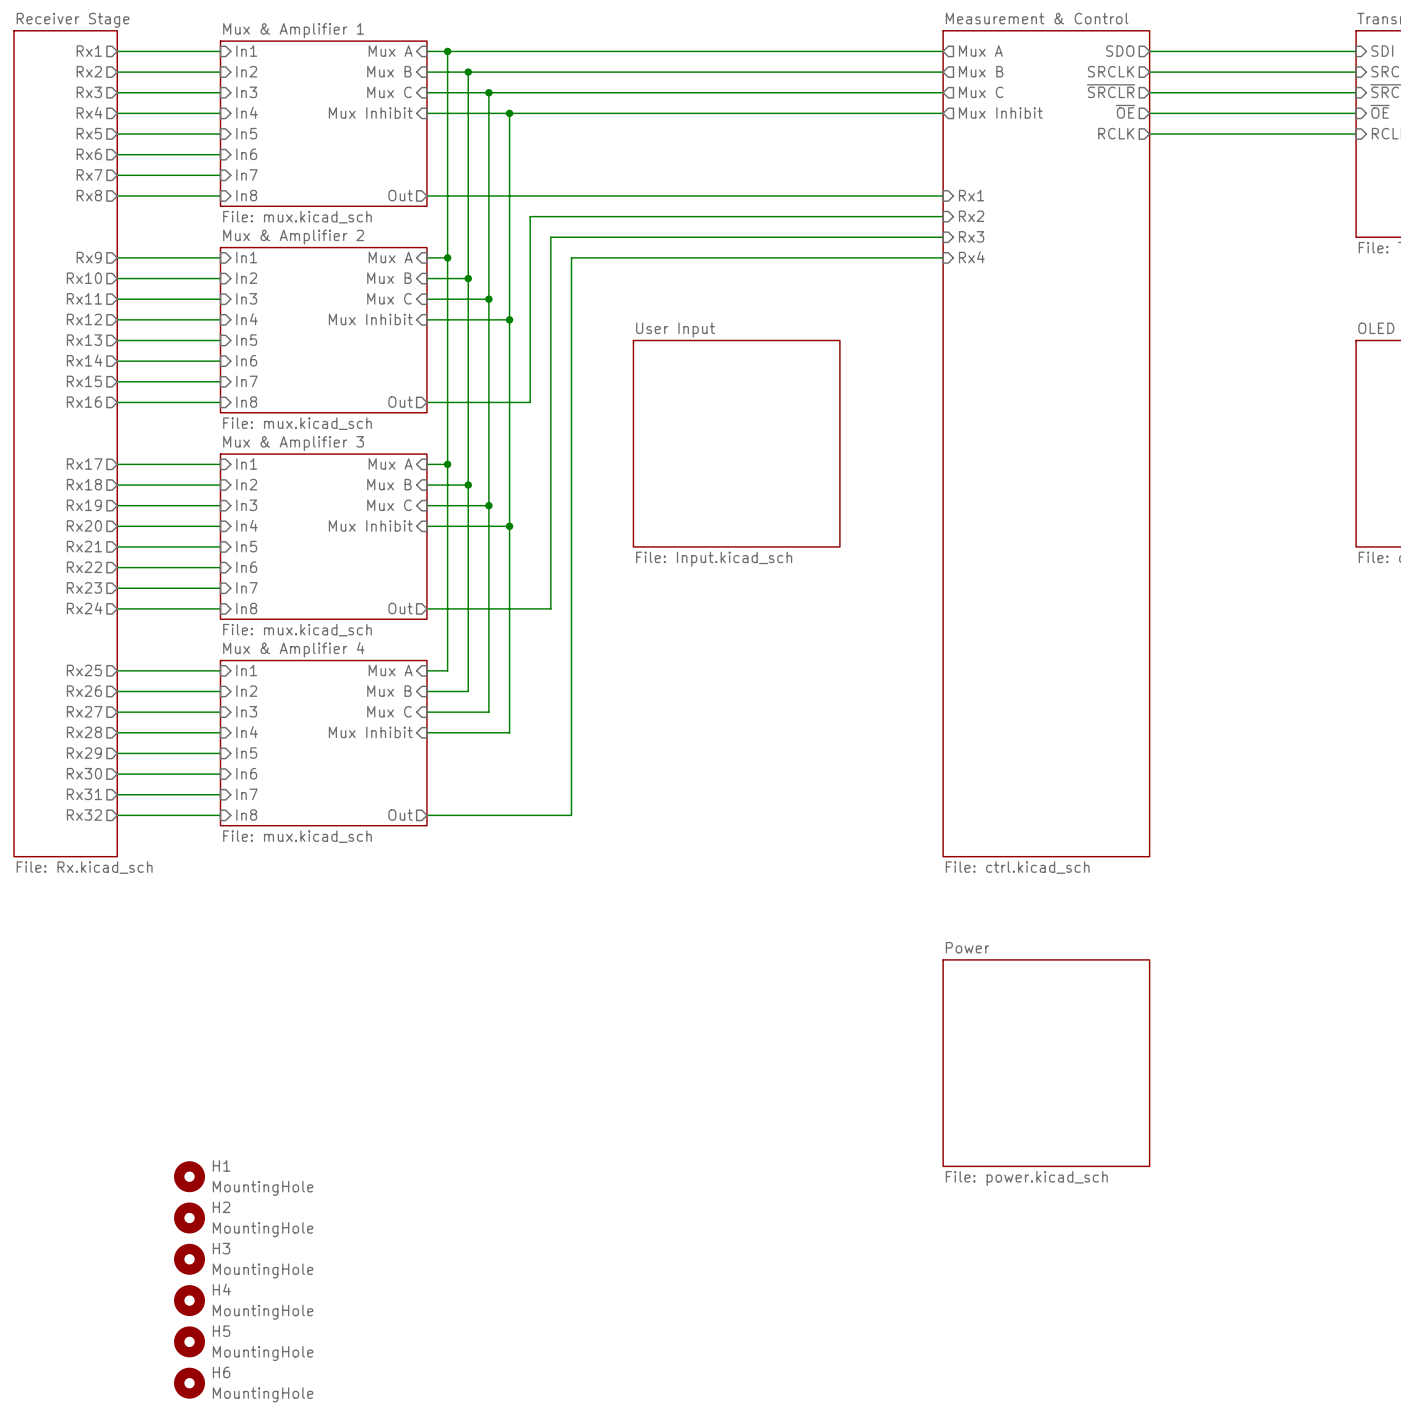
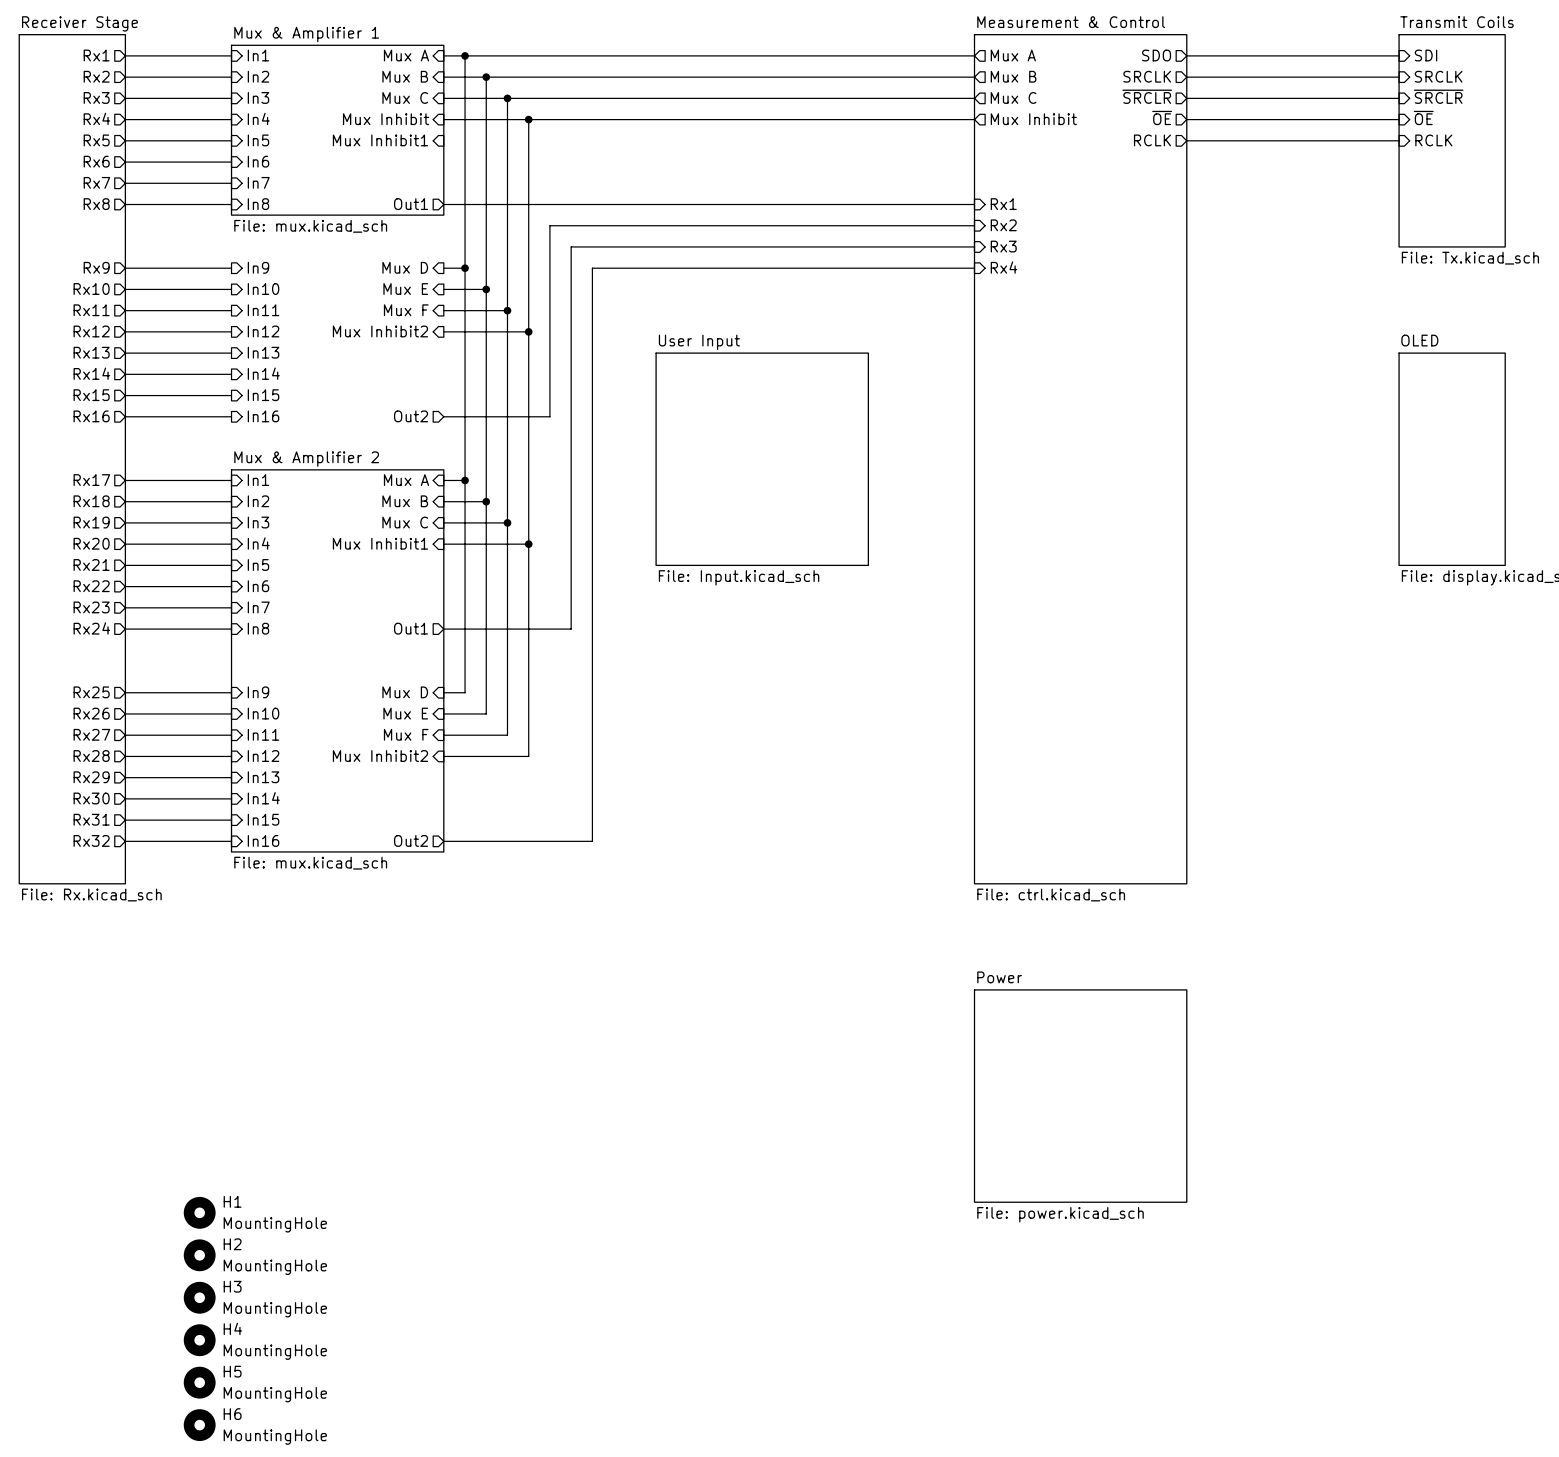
sheet pin: none -> Mux Inhibit1 (380, 140)
sheet pin: Out (400, 195) -> Out1 (411, 204)
sheet Mux & Amplifier 2 name position: Mux & Amplifier 2 (293, 237) -> Mux & Amplifier 2 (306, 459)
sheet Mux & Amplifier 2 shape: [219, 246, 428, 414] -> [230, 469, 445, 853]
sheet pin: In1 (246, 257) -> In9 (258, 267)
sheet pin: Mux A (390, 257) -> Mux D (405, 267)
sheet pin: In2 (246, 278) -> In10 (263, 289)
sheet pin: Mux B (389, 278) -> Mux E (405, 289)
sheet pin: In3 (246, 298) -> In11 (263, 310)
sheet pin: Mux C (389, 298) -> Mux F (406, 310)
sheet pin: In4 (246, 319) -> In12 (263, 331)
sheet pin: Mux Inhibit (370, 319) -> Mux Inhibit2 (380, 331)
sheet pin: In5 (246, 340) -> In13 (263, 352)
sheet pin: In6 (246, 360) -> In14 (263, 373)
sheet pin: In7 (246, 381) -> In15 (263, 395)
sheet pin: In8 (246, 402) -> In16 (263, 416)
sheet pin: Out (400, 402) -> Out2 (411, 416)
sheet Mux & Amplifier 2 value position: File: mux.kicad_sch (297, 423) -> File: mux.kicad_sch (310, 863)
sheet pin: Mux Inhibit (370, 525) -> Mux Inhibit1 (380, 543)
sheet Mux & Amplifier 3: File: mux.kicad_sch (323, 536) -> none
sheet pin: Out (400, 608) -> Out1 (411, 628)
sheet pin: In1 (246, 670) -> In9 (258, 692)
sheet pin: Mux A (390, 670) -> Mux D (405, 692)
sheet pin: In2 (246, 691) -> In10 (263, 713)
sheet pin: Mux B (389, 691) -> Mux E (405, 713)
sheet pin: In3 (246, 711) -> In11 (263, 734)
sheet pin: Mux C (389, 711) -> Mux F (406, 734)
sheet pin: In4 (246, 732) -> In12 (263, 756)
sheet pin: Mux Inhibit (370, 732) -> Mux Inhibit2 (380, 756)
sheet Mux & Amplifier 4: File: mux.kicad_sch (323, 743) -> none
sheet pin: In5 (246, 753) -> In13 (263, 777)
sheet pin: In6 (246, 773) -> In14 (263, 798)
sheet pin: In7 (246, 794) -> In15 (263, 819)
sheet pin: In8 (246, 815) -> In16 (263, 840)
sheet pin: Out (400, 815) -> Out2 (411, 840)

